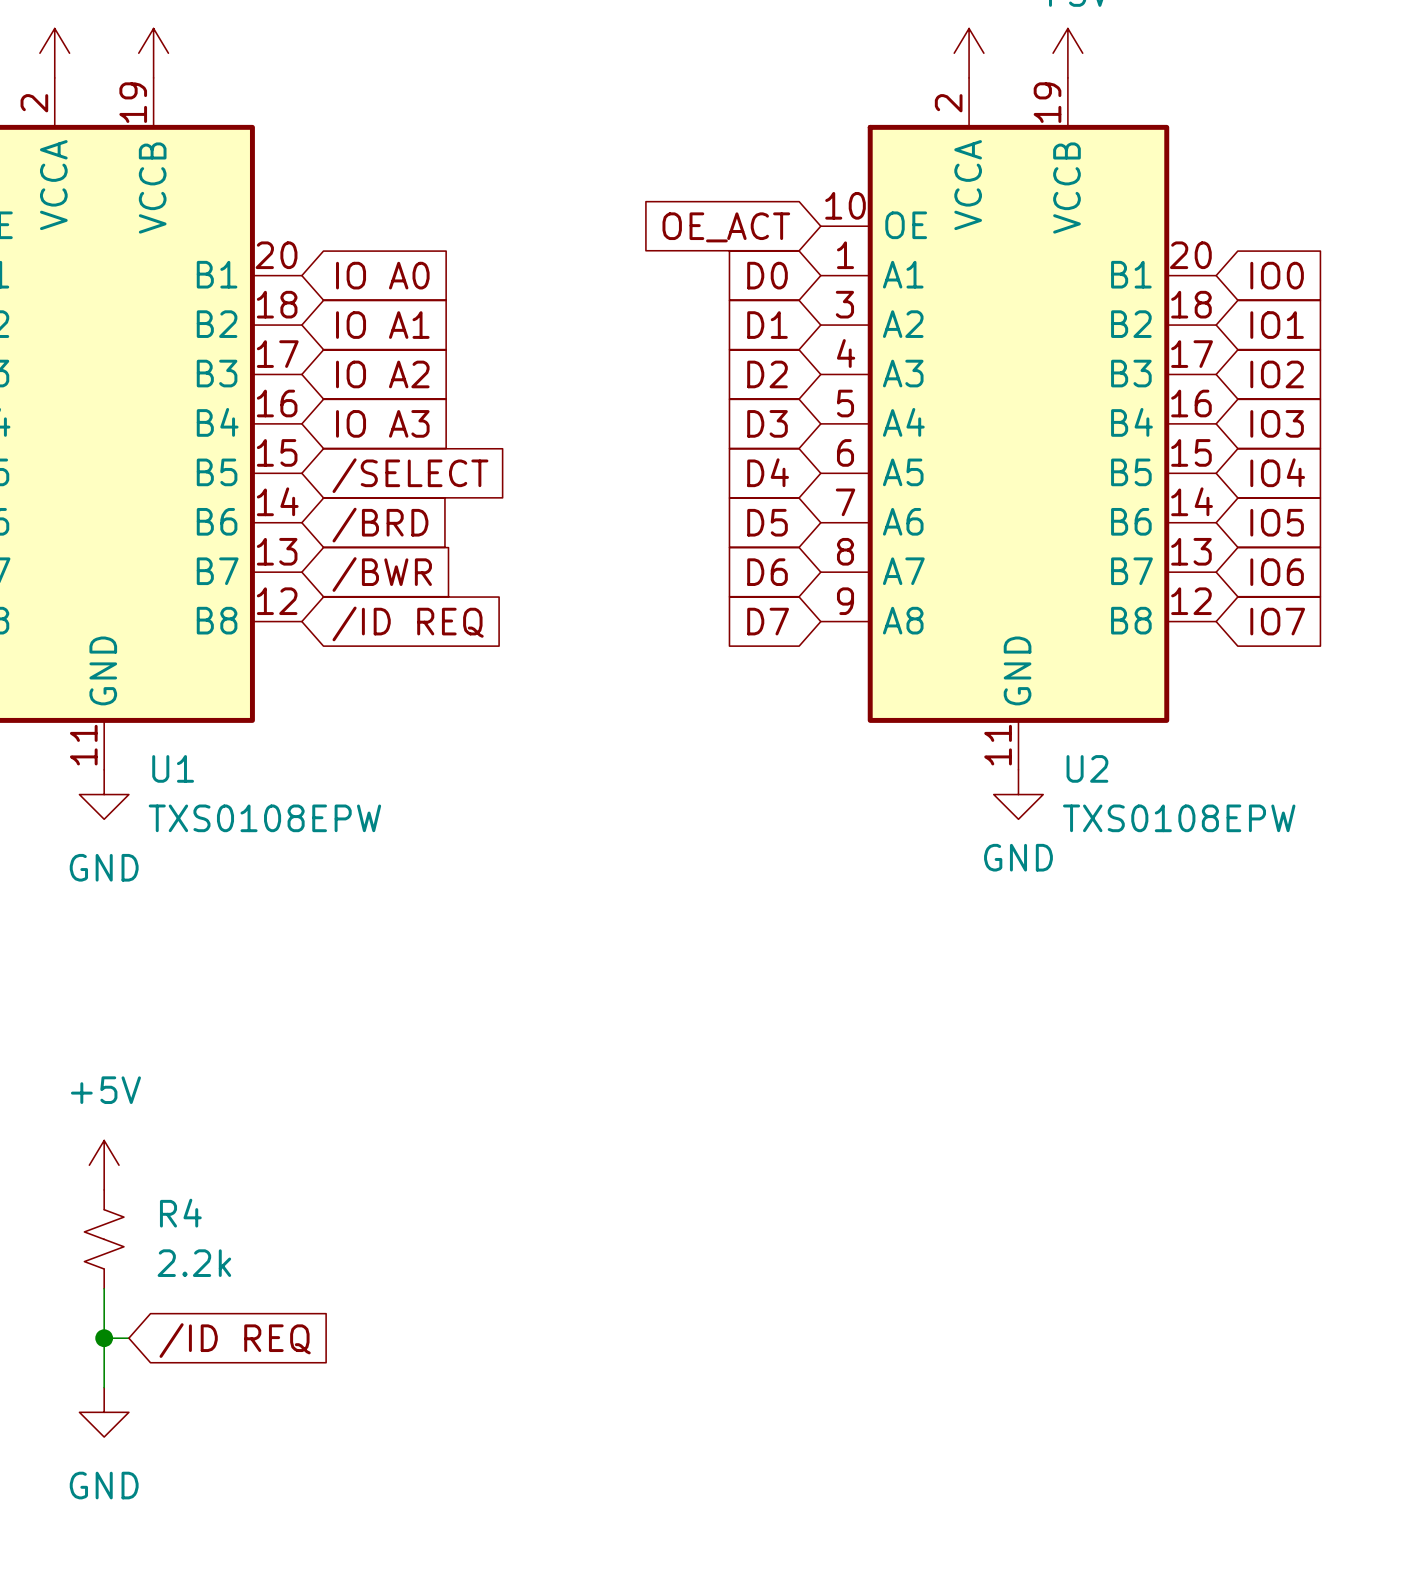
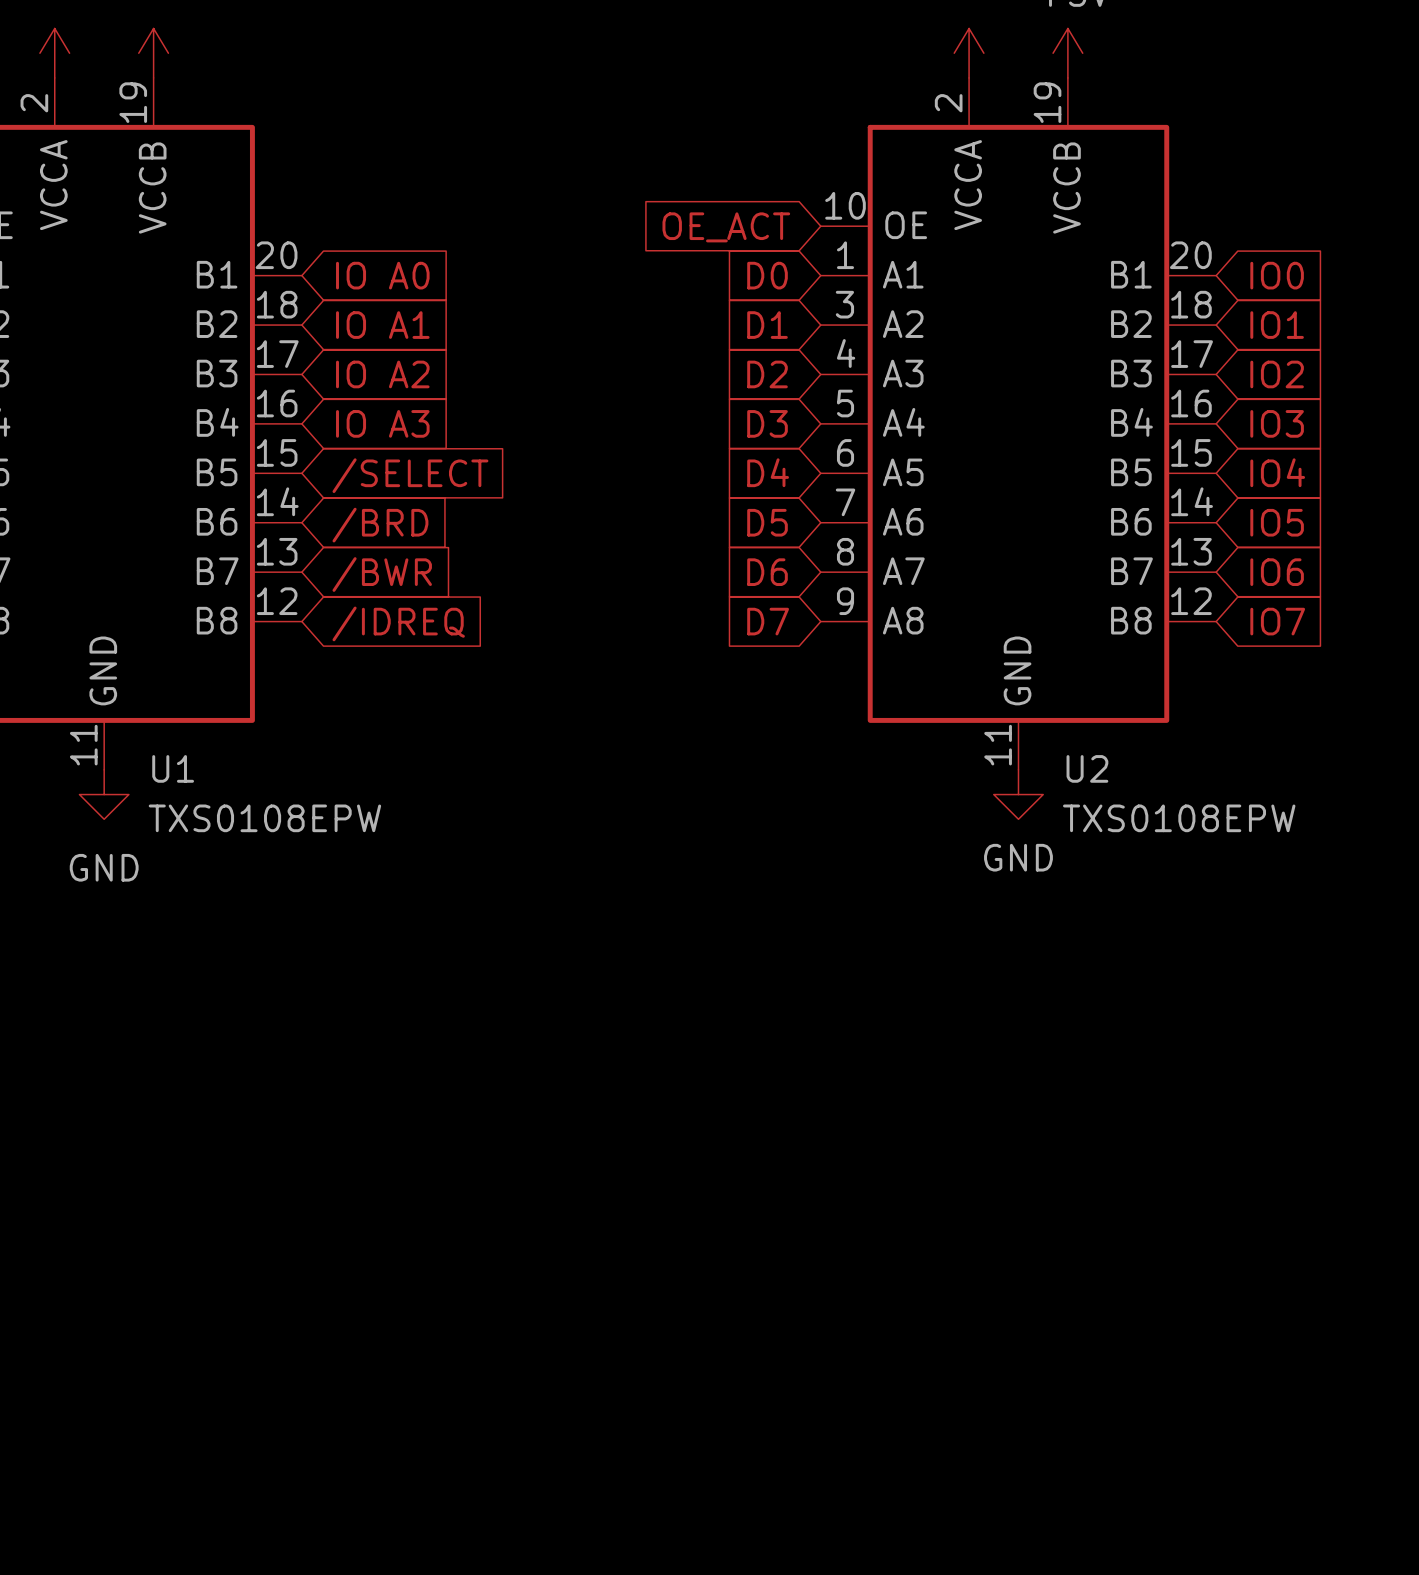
global label: /ID REQ (408, 623) -> /IDREQ (398, 623)
power symbol: +5V (104, 1165) -> none
R4: 2.2k (104, 1239) -> none
wire: (104, 1288) (104, 1387) -> none
wire: (104, 1338) (128, 1338) -> none
junction: (104, 1338) -> none
global label: /ID REQ (235, 1340) -> none
power symbol: GND (104, 1412) -> none

